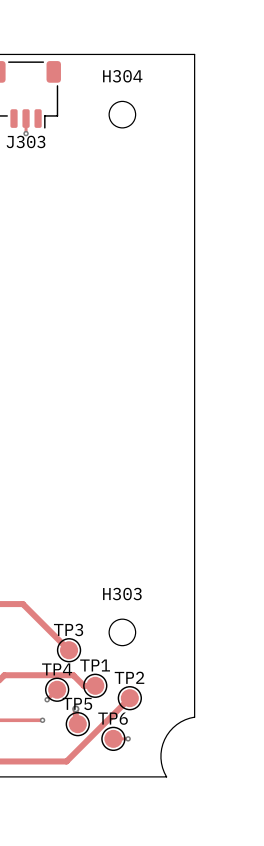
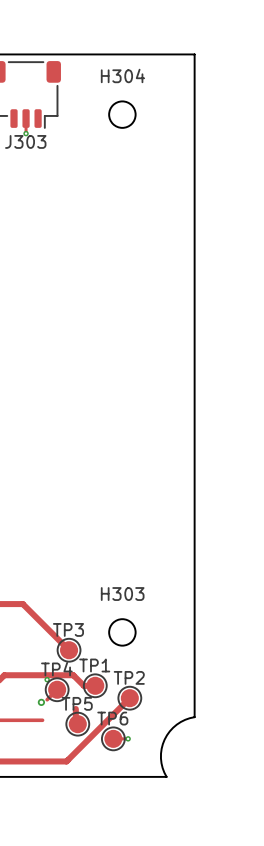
via position: (47, 699) -> (47, 679)
via position: (75, 708) -> (41, 702)
via: (42, 720) -> none

